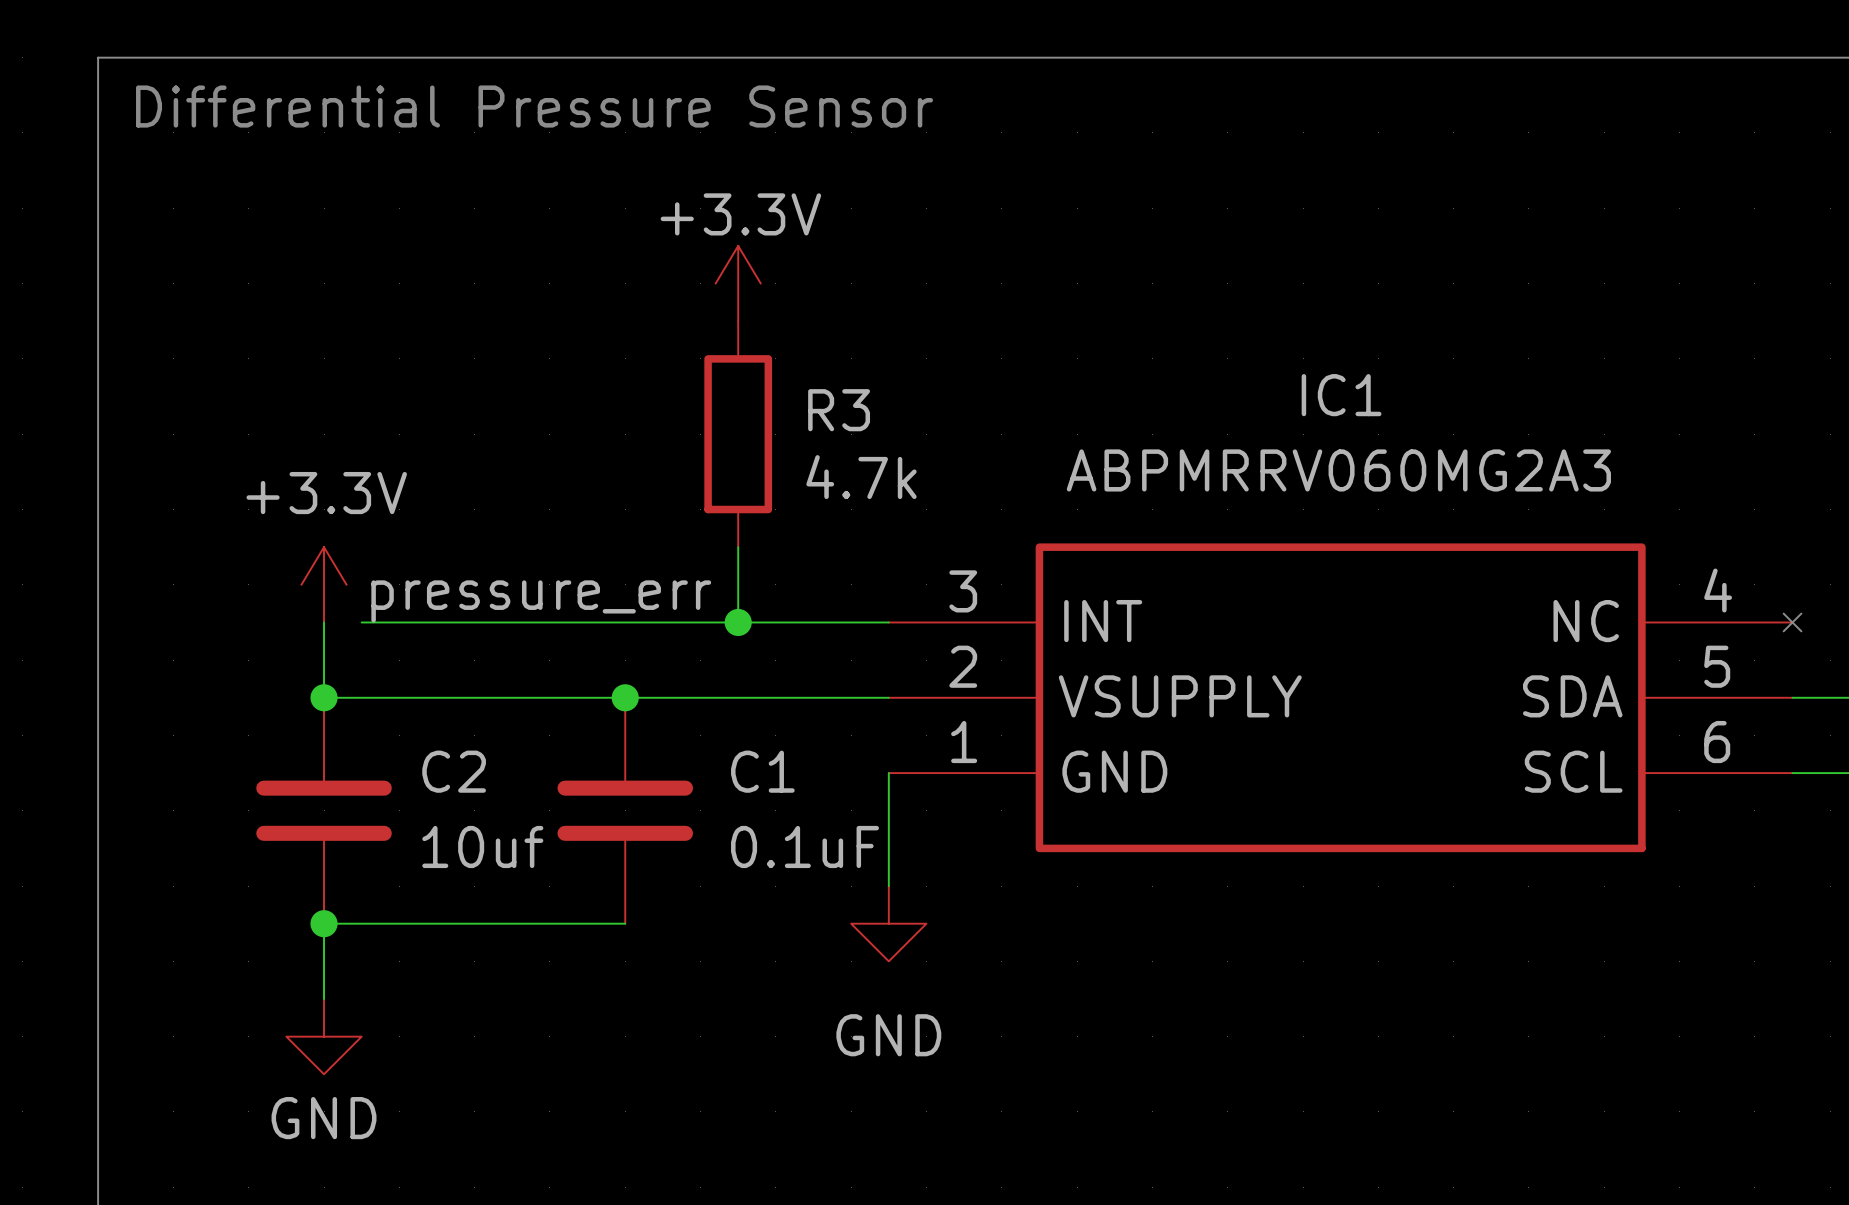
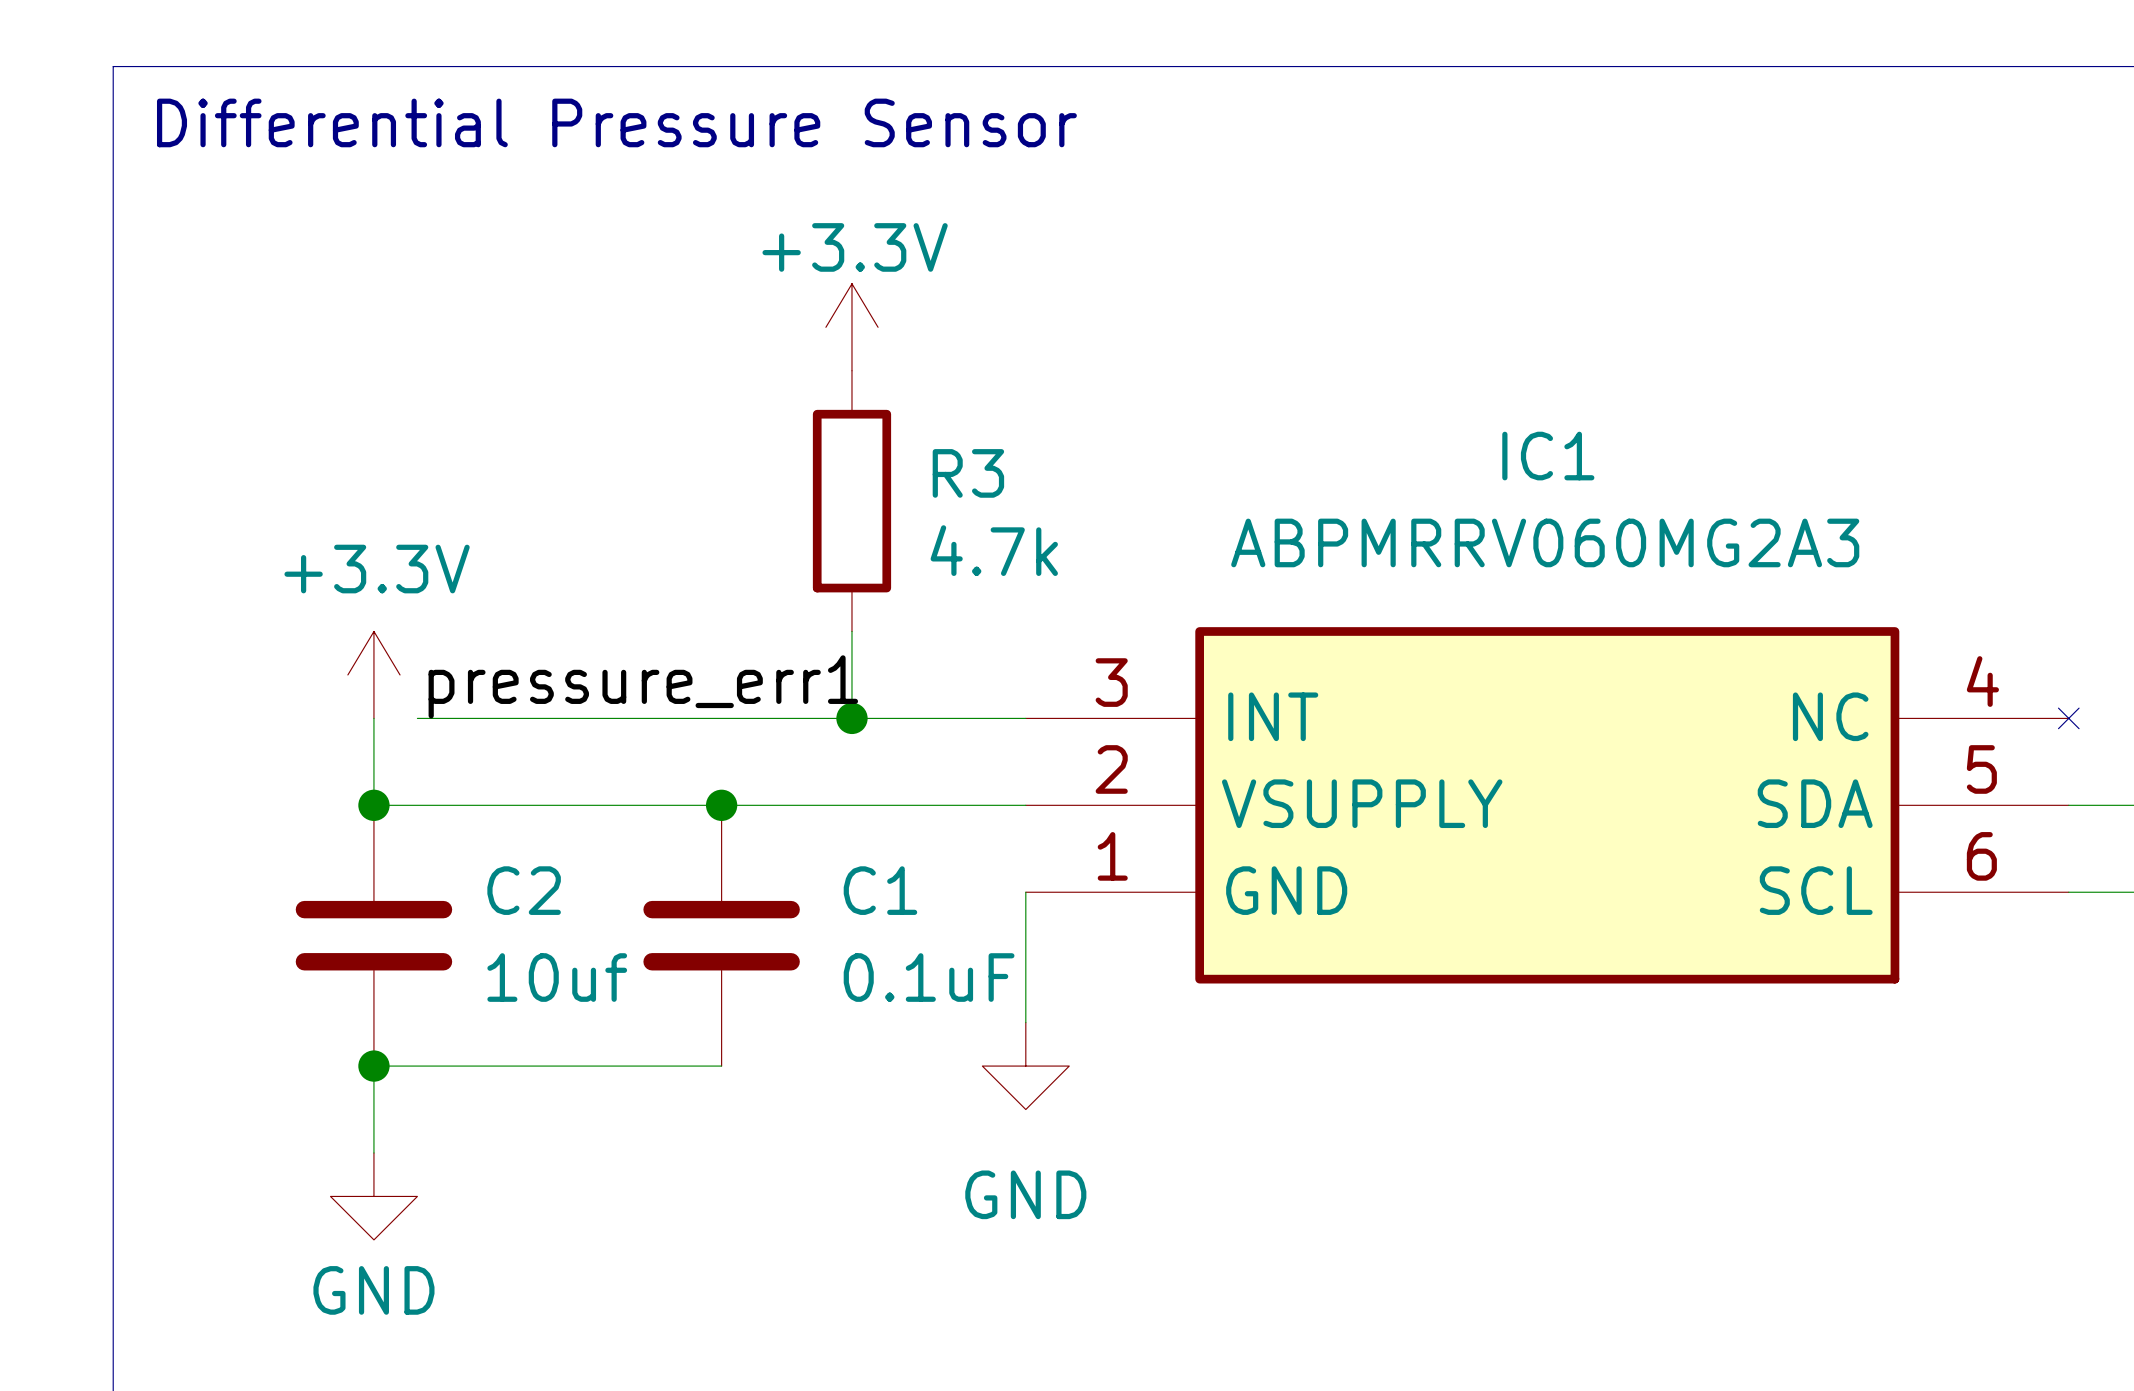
label: pressure_err (541, 601) -> pressure_err1 (643, 686)

